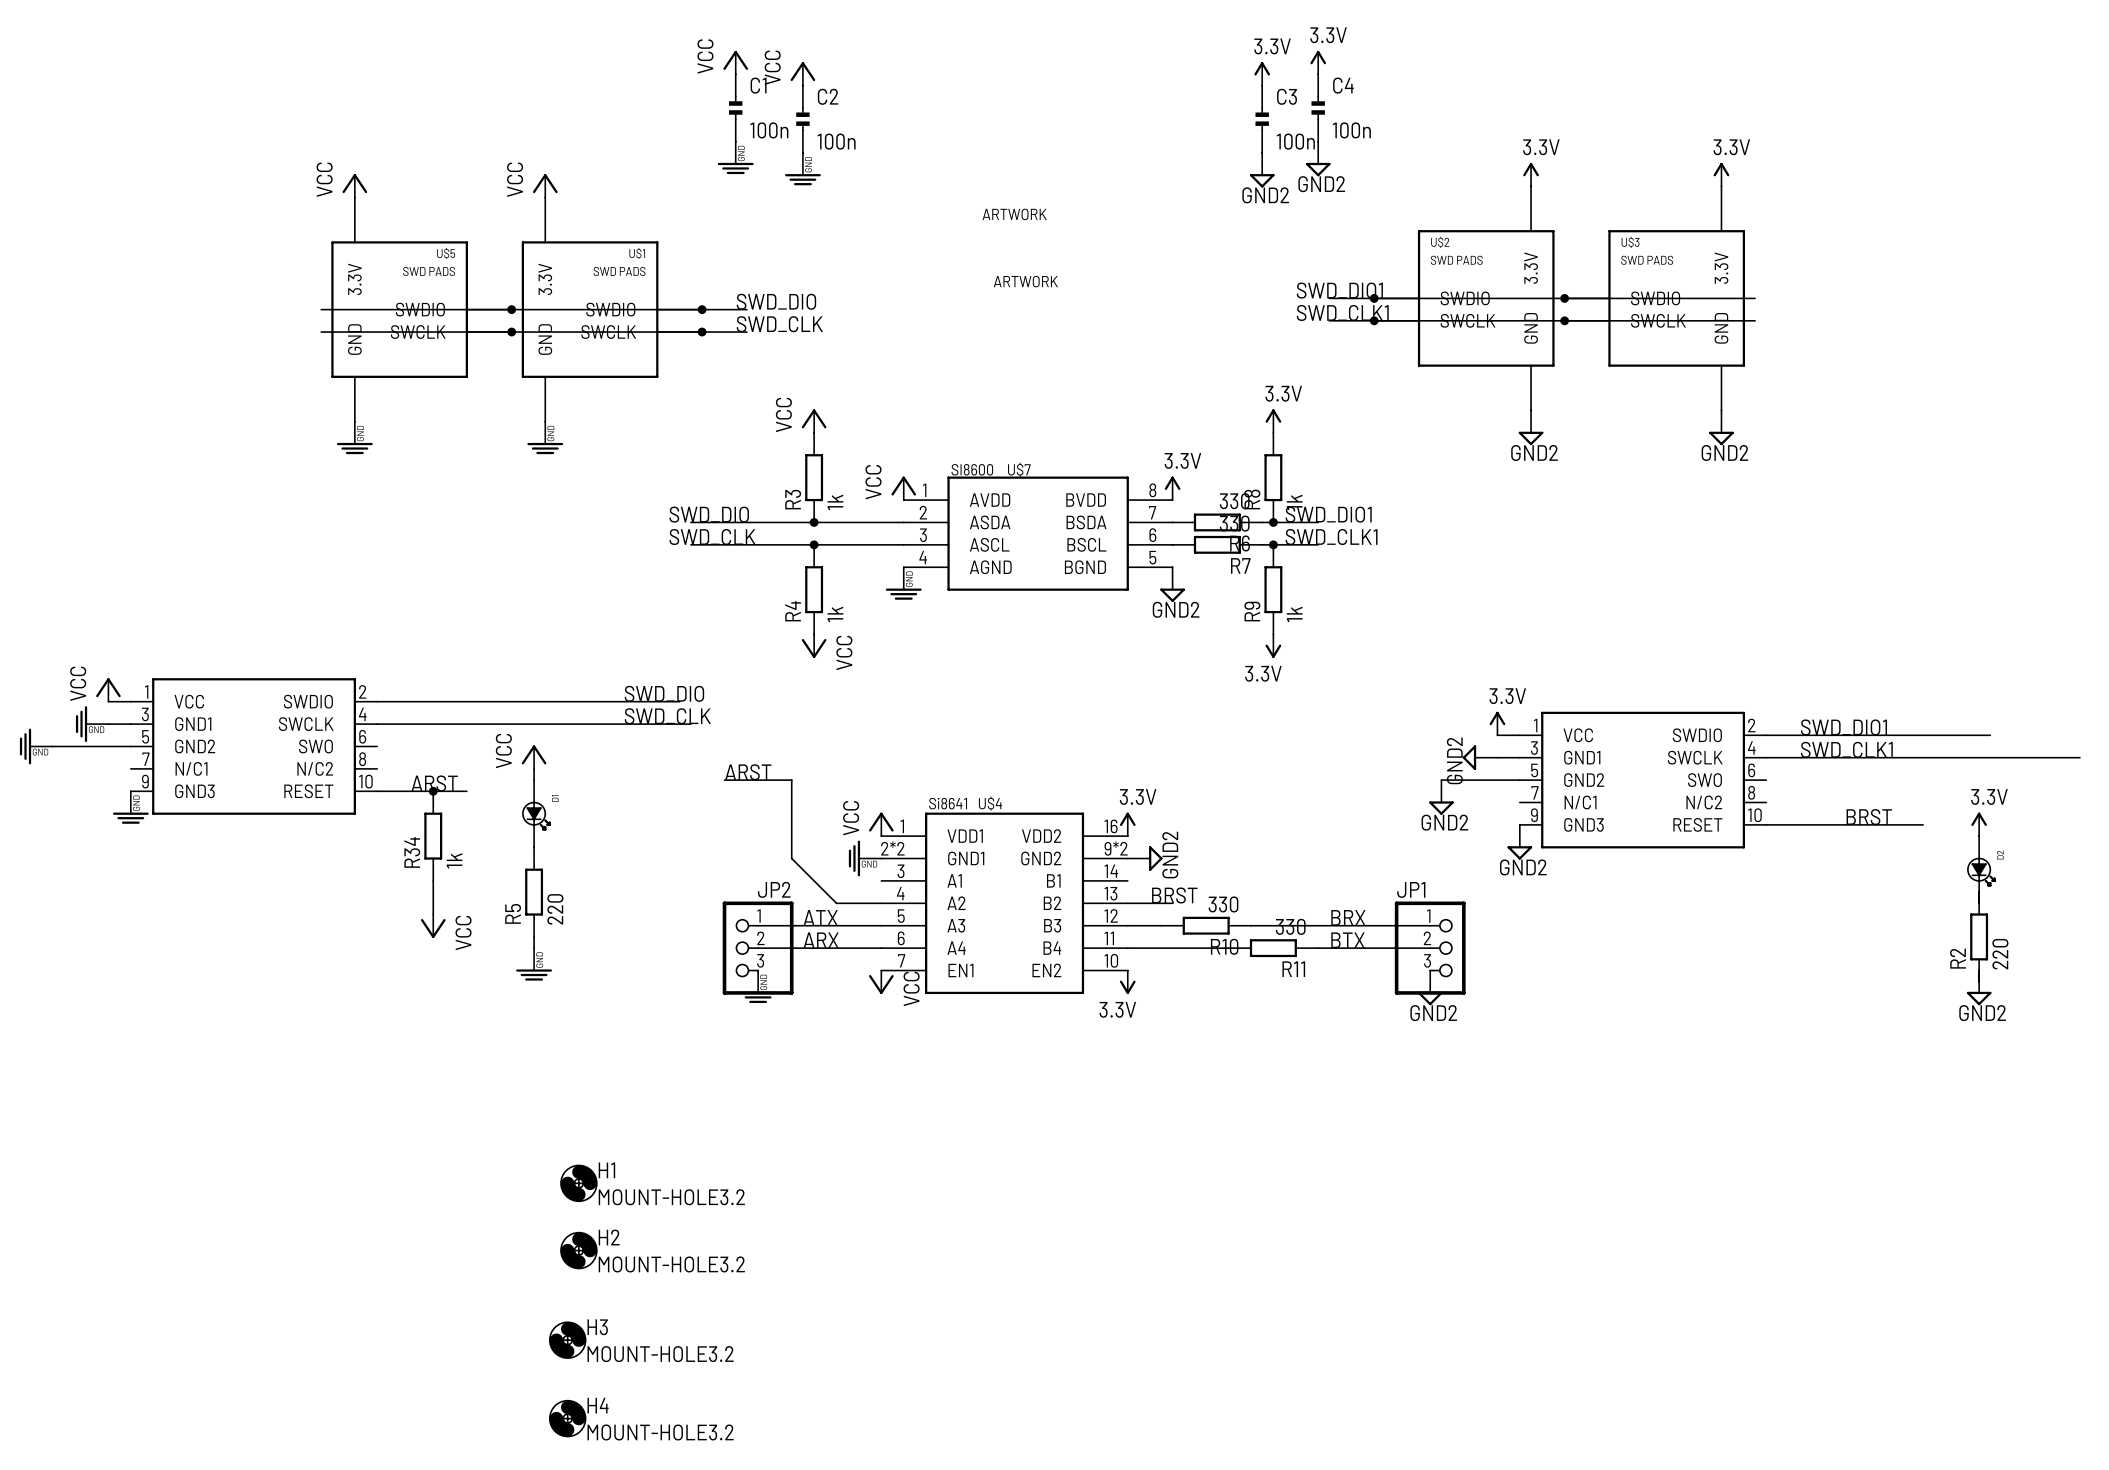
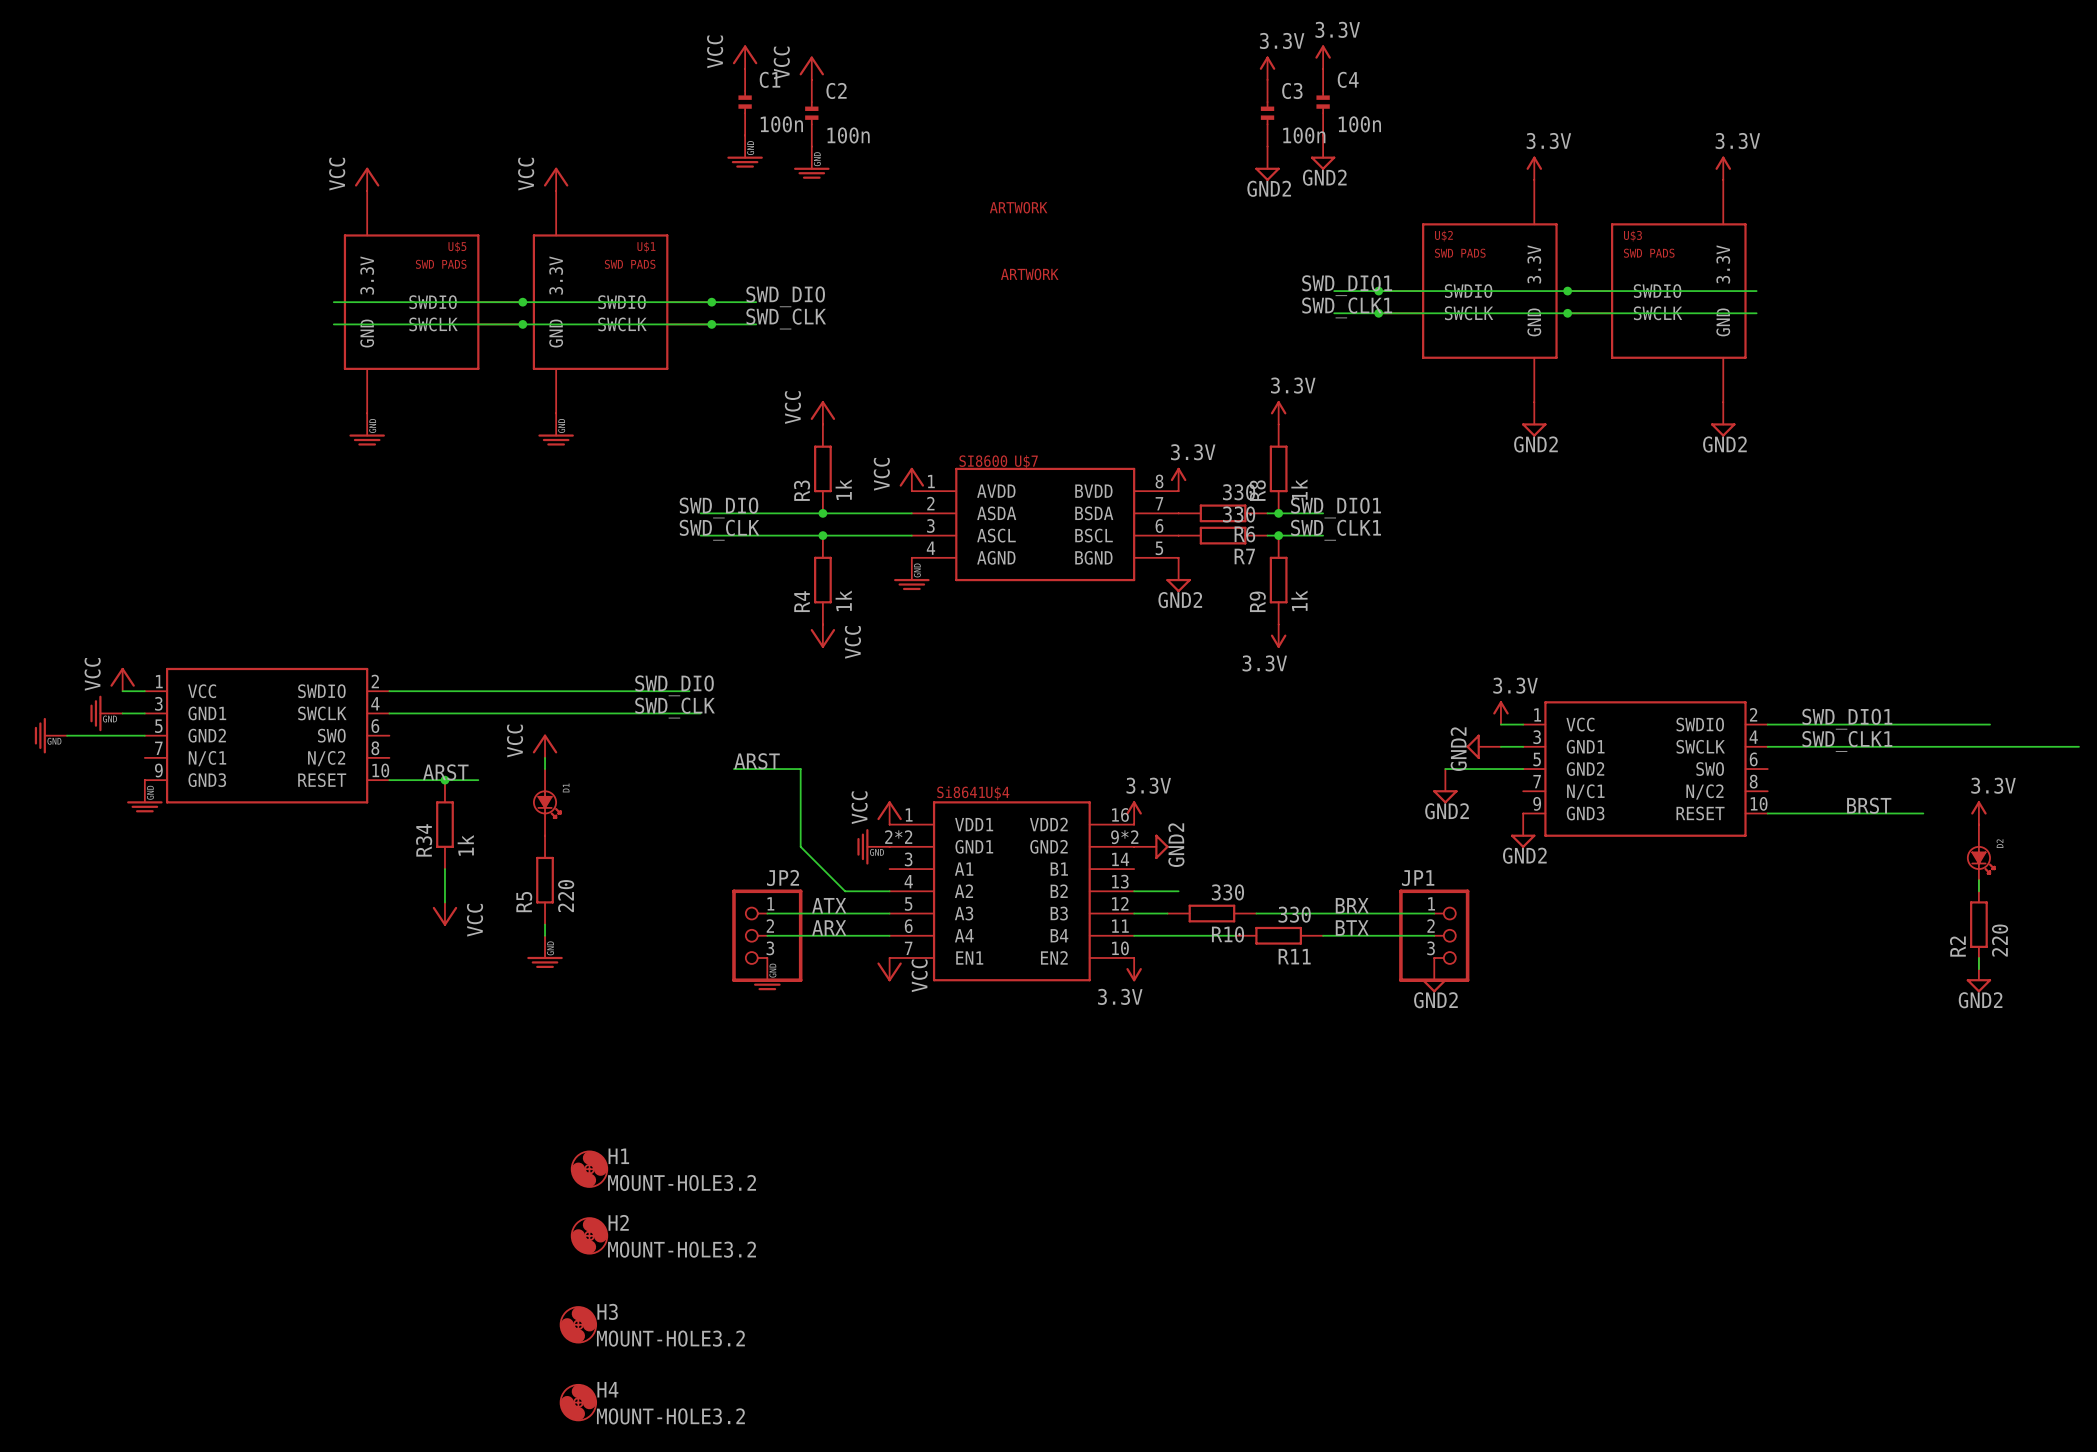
label: BRST (1174, 895) -> none

